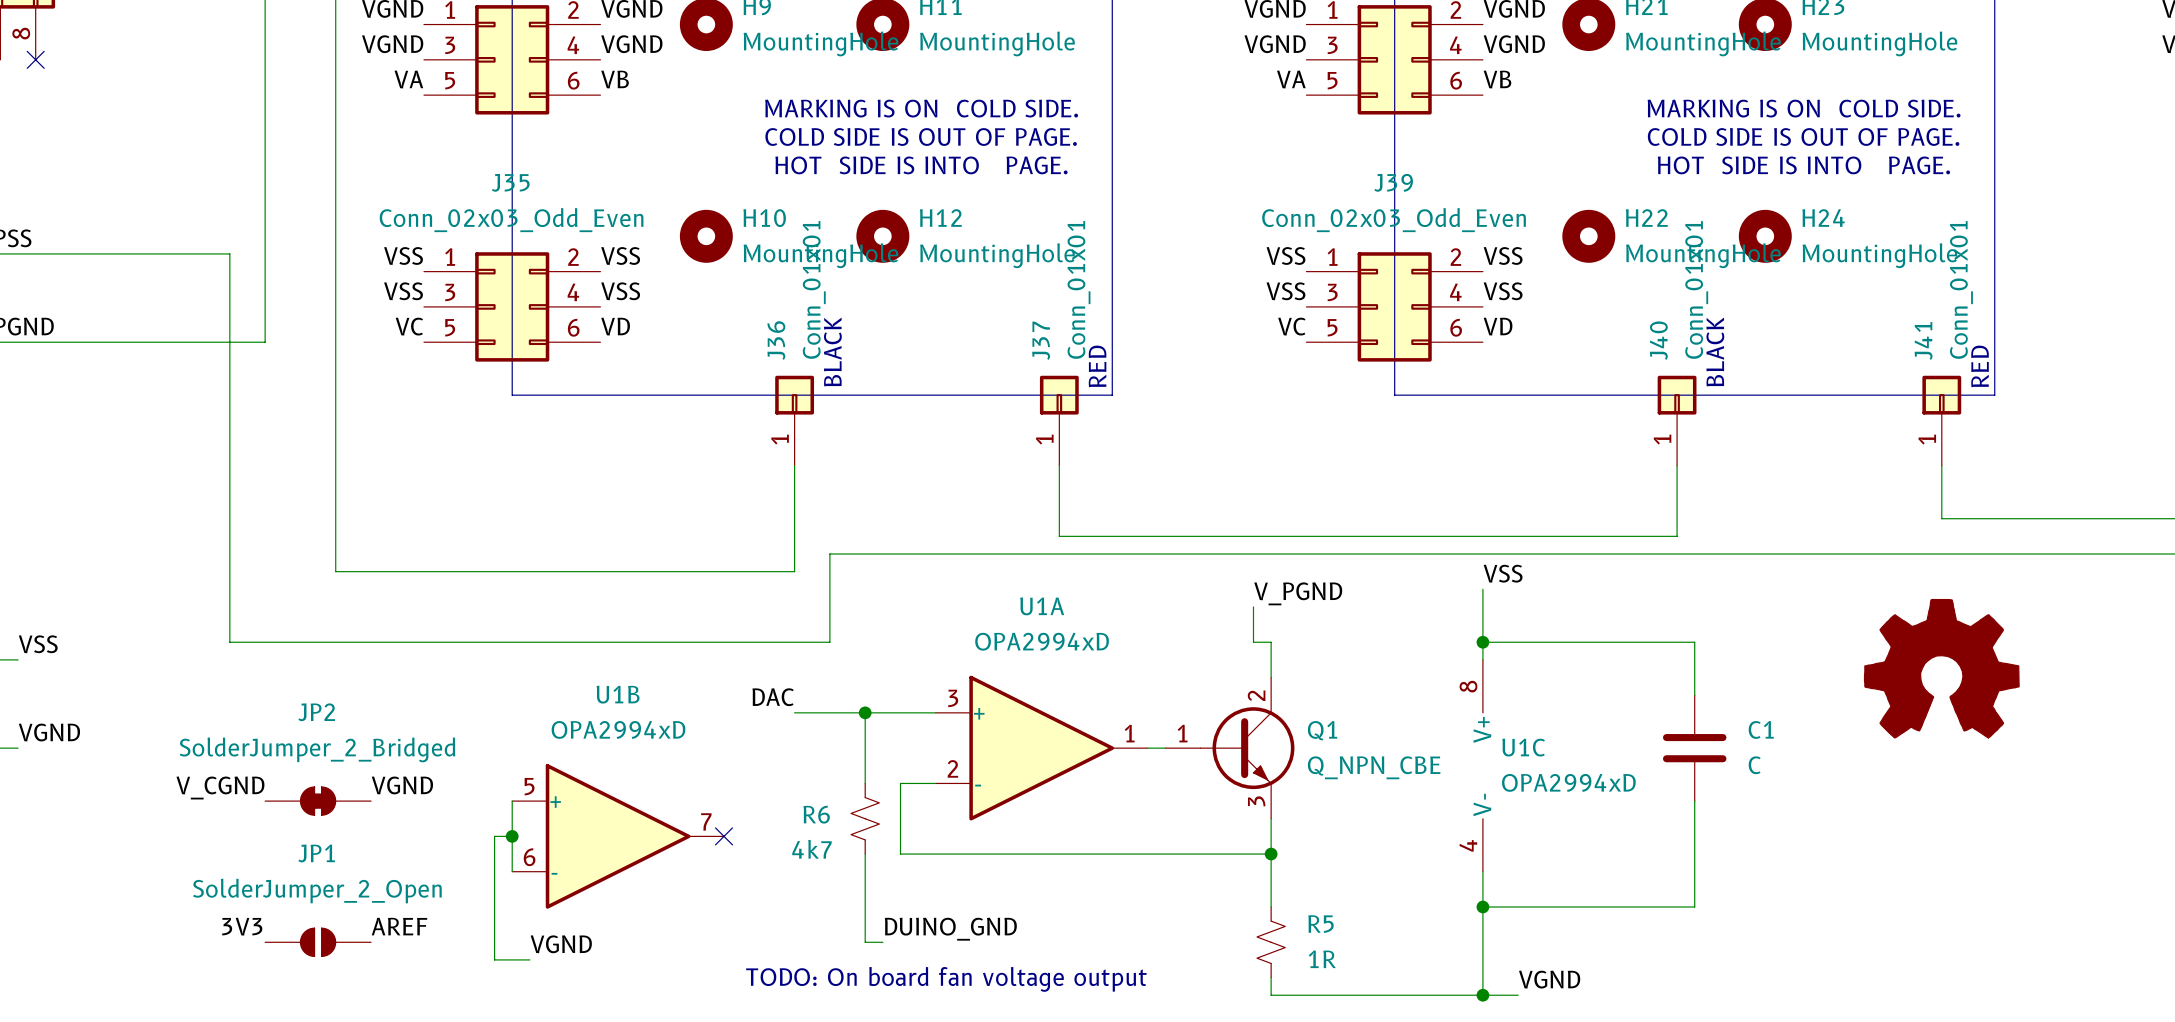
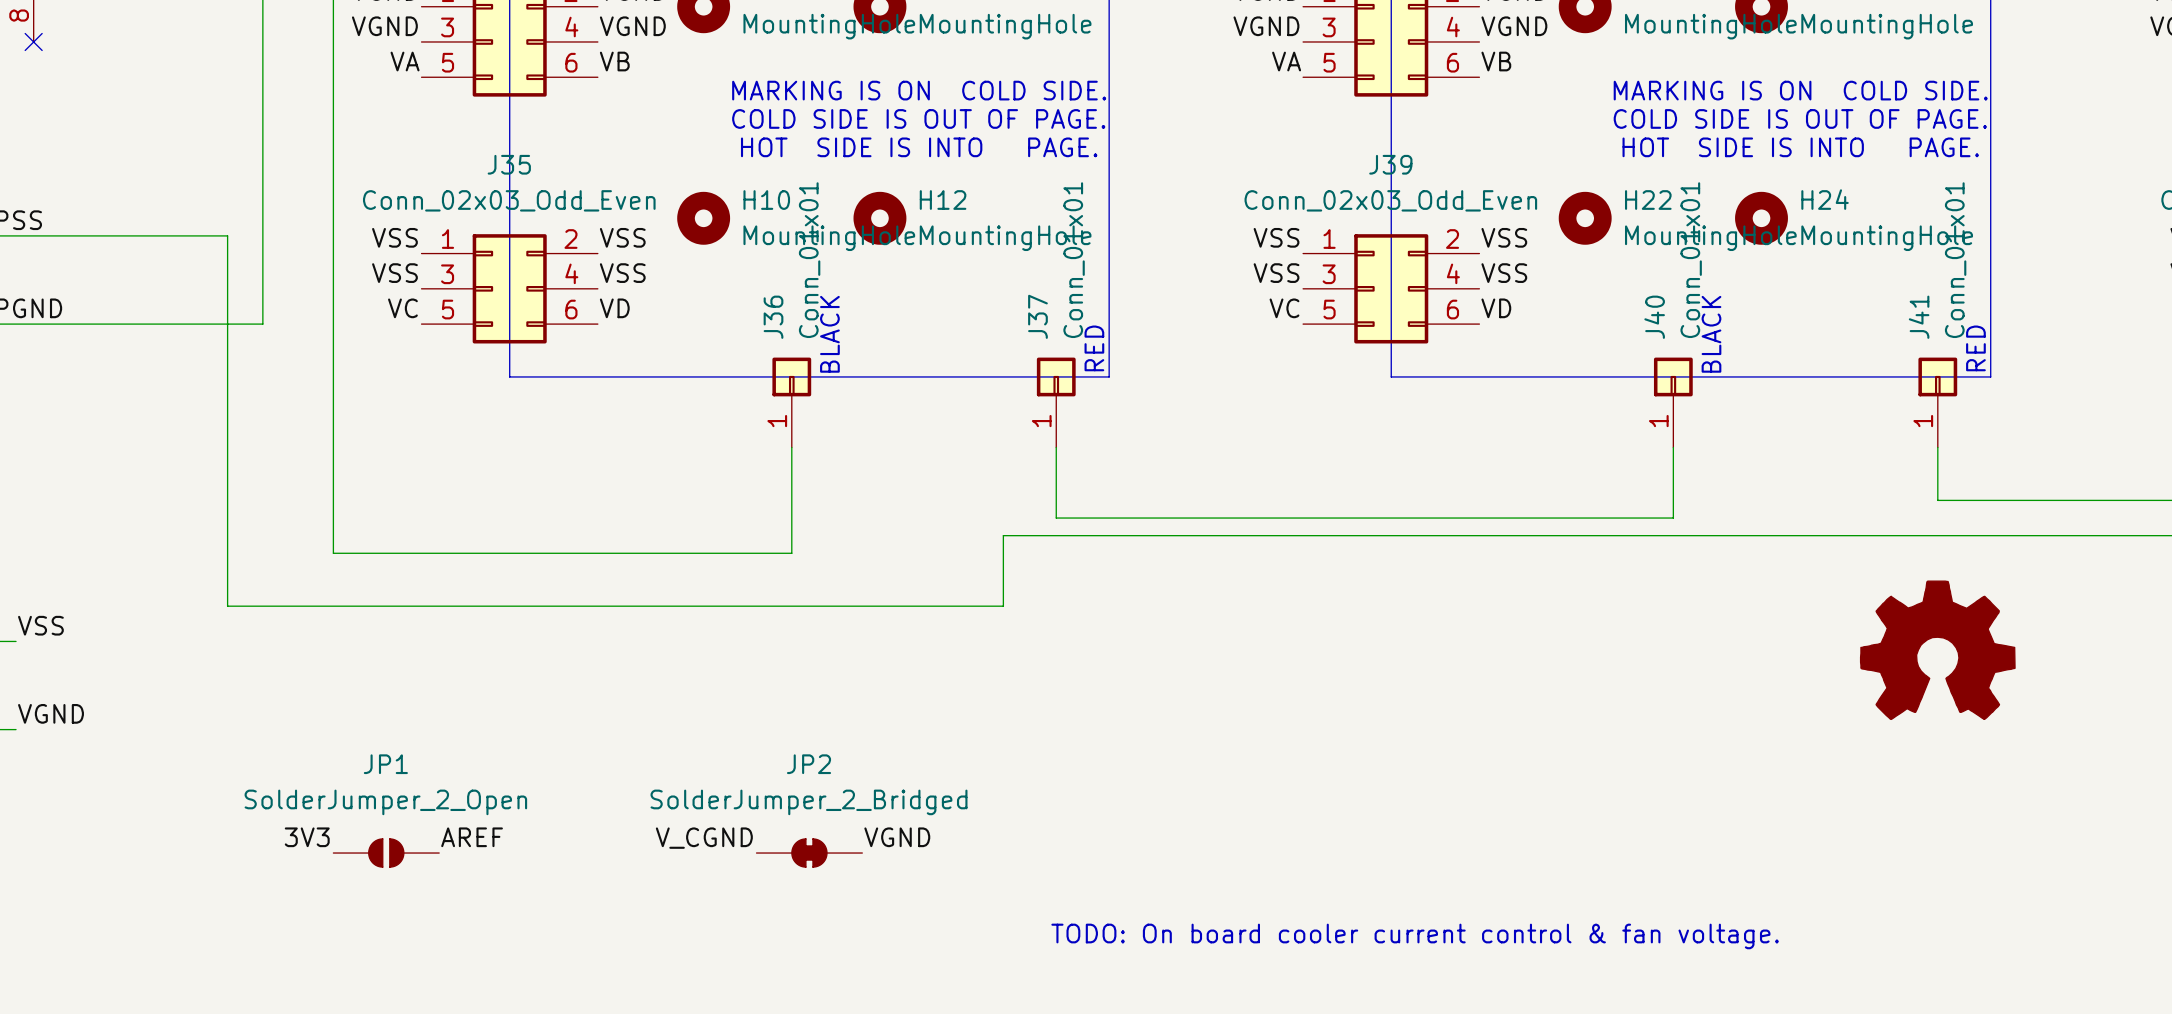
wire: (1006, 554) (829, 554) (829, 642) (229, 642) (229, 624) -> (1003, 535) (1003, 606) (227, 606)
label: VSS (1503, 573) -> none
wire: (1482, 589) (1482, 659) -> none
label: V_PGND (1298, 593) -> none
wire: (1253, 606) (1253, 642) (1271, 642) (1271, 677) -> none
wire: (1482, 642) (1694, 642) (1694, 695) -> none
junction: (1482, 642) -> none
label: DAC (773, 697) -> none
wire: (794, 712) (935, 712) -> none
wire: (865, 712) (865, 783) -> none
junction: (865, 712) -> none
U1A: OPA2994xD (1041, 748) -> none
wire: (1147, 748) (1165, 748) -> none
Q1: Q_NPN_CBE (1229, 748) -> none
C1: C (1694, 748) -> none
U1C: OPA2994xD (1482, 765) -> none
wire: (935, 783) (900, 783) (900, 854) (1271, 854) -> none
label: VGND (402, 785) -> none
label: V_CGND (220, 787) -> none
JP2 position: (318, 801) -> (809, 853)
wire: (512, 801) (512, 871) -> none
wire: (1694, 801) (1694, 906) (1482, 906) -> none
R6: 4k7 (865, 818) -> none
wire: (1271, 818) (1271, 906) -> none
wire: (512, 836) (494, 836) (494, 959) (529, 959) -> none
junction: (512, 836) -> none
U1B: OPA2994xD (618, 836) -> none
no-connect mark: (724, 836) -> none
wire: (865, 854) (865, 942) (882, 942) -> none
junction: (1271, 854) -> none
label: none -> VGND (897, 837)
label: none -> V_CGND (704, 838)
wire: (1482, 871) (1482, 995) -> none
junction: (1482, 906) -> none
label position: 3V3 (242, 926) -> 3V3 (307, 837)
label position: AREF (399, 926) -> AREF (472, 837)
label: DUINO_GND (950, 929) -> none
JP1 position: (318, 942) -> (386, 853)
R5: 1R (1271, 942) -> none
label: VGND (561, 944) -> none
text: none -> TODO: On board cooler current control & fan voltage. (1415, 936)
wire: (1271, 977) (1271, 995) (1518, 995) -> none
text: TODO: On board fan voltage output (946, 979) -> none
label: VGND (1549, 979) -> none
junction: (1482, 995) -> none

